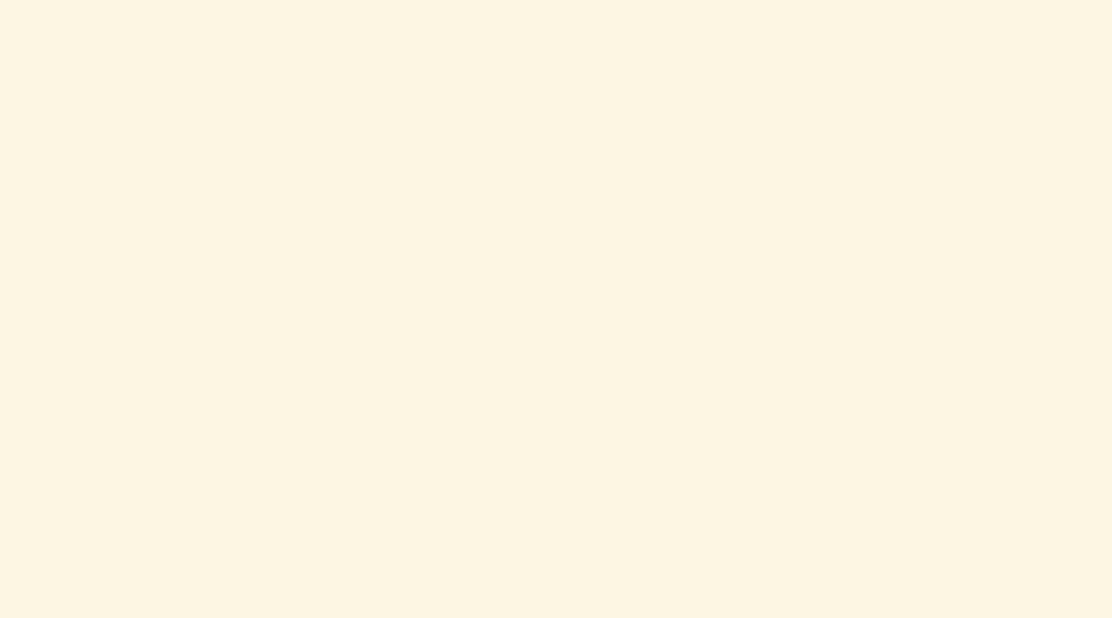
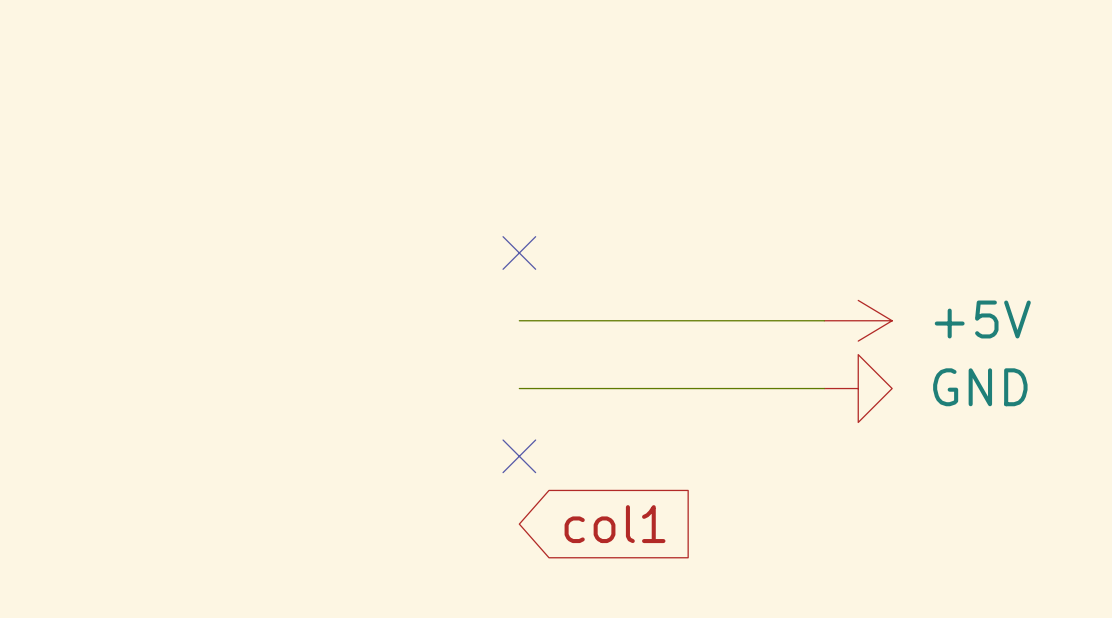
no-connect mark: none -> (519, 252)
wire: none -> (519, 320) (824, 320)
power symbol: none -> +5V (858, 320)
wire: none -> (519, 388) (824, 388)
power symbol: none -> GND (858, 388)
no-connect mark: none -> (519, 456)
global label: none -> col1 (615, 524)

